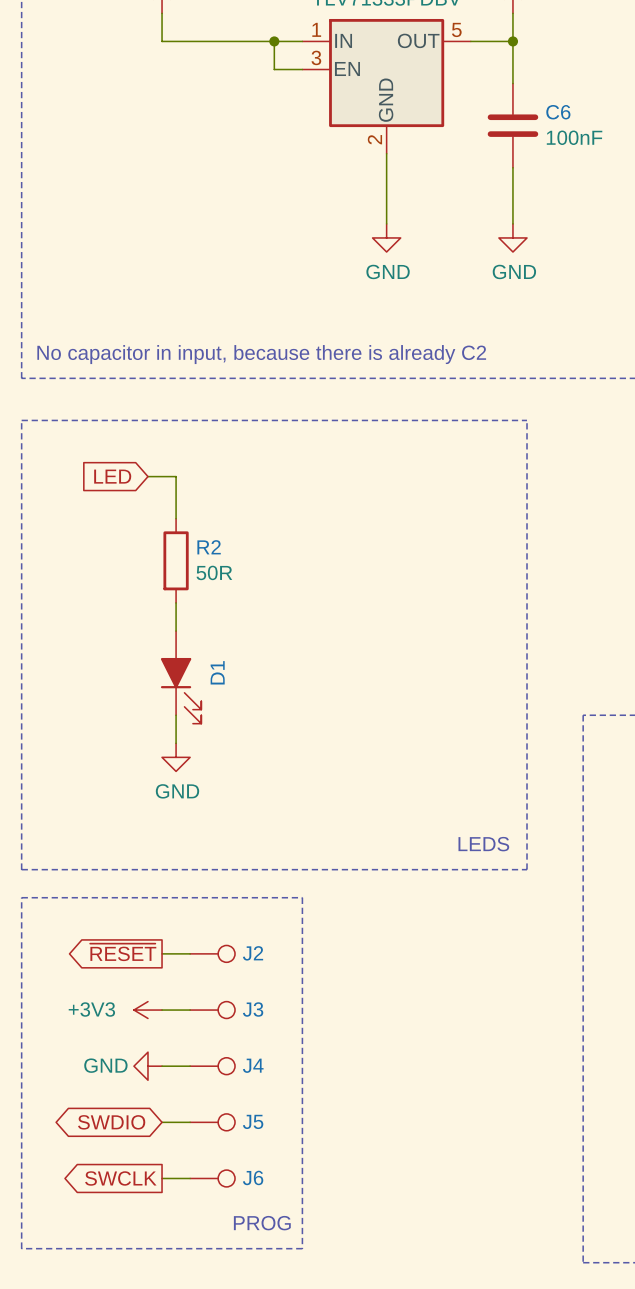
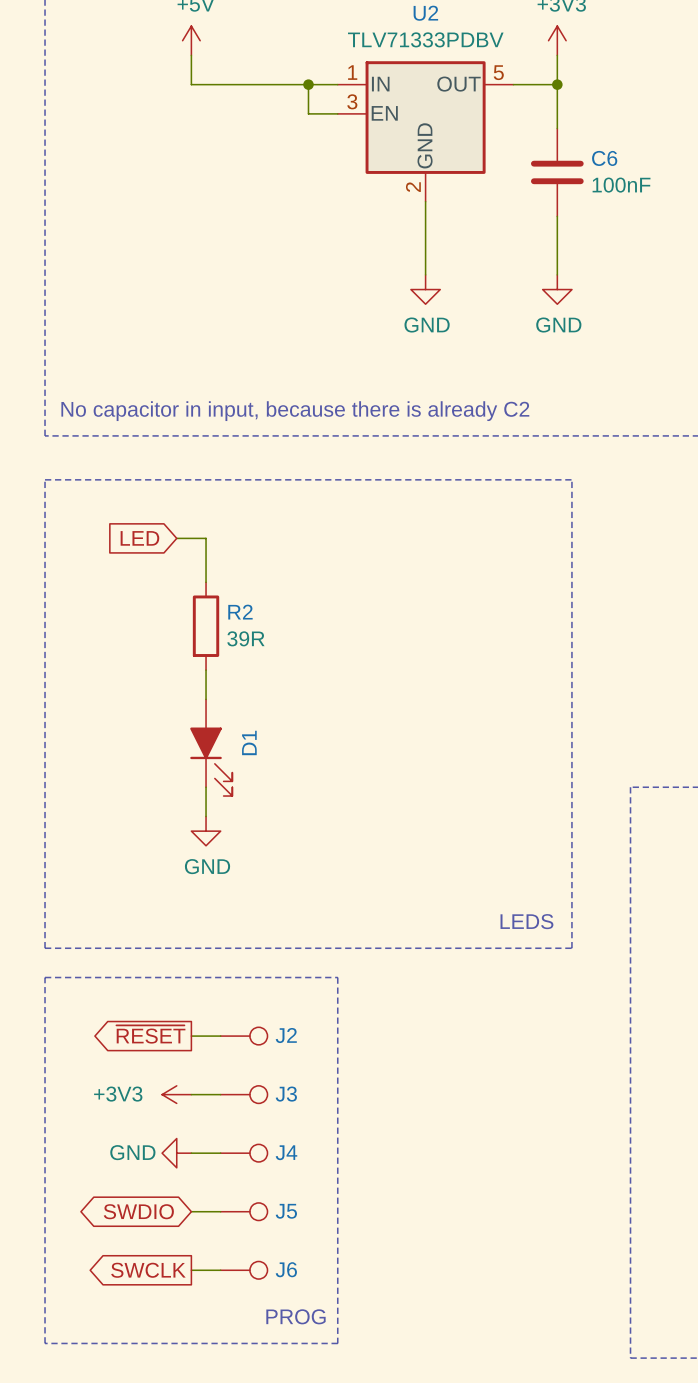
R2 value: 50R (214, 572) -> 39R (245, 638)

